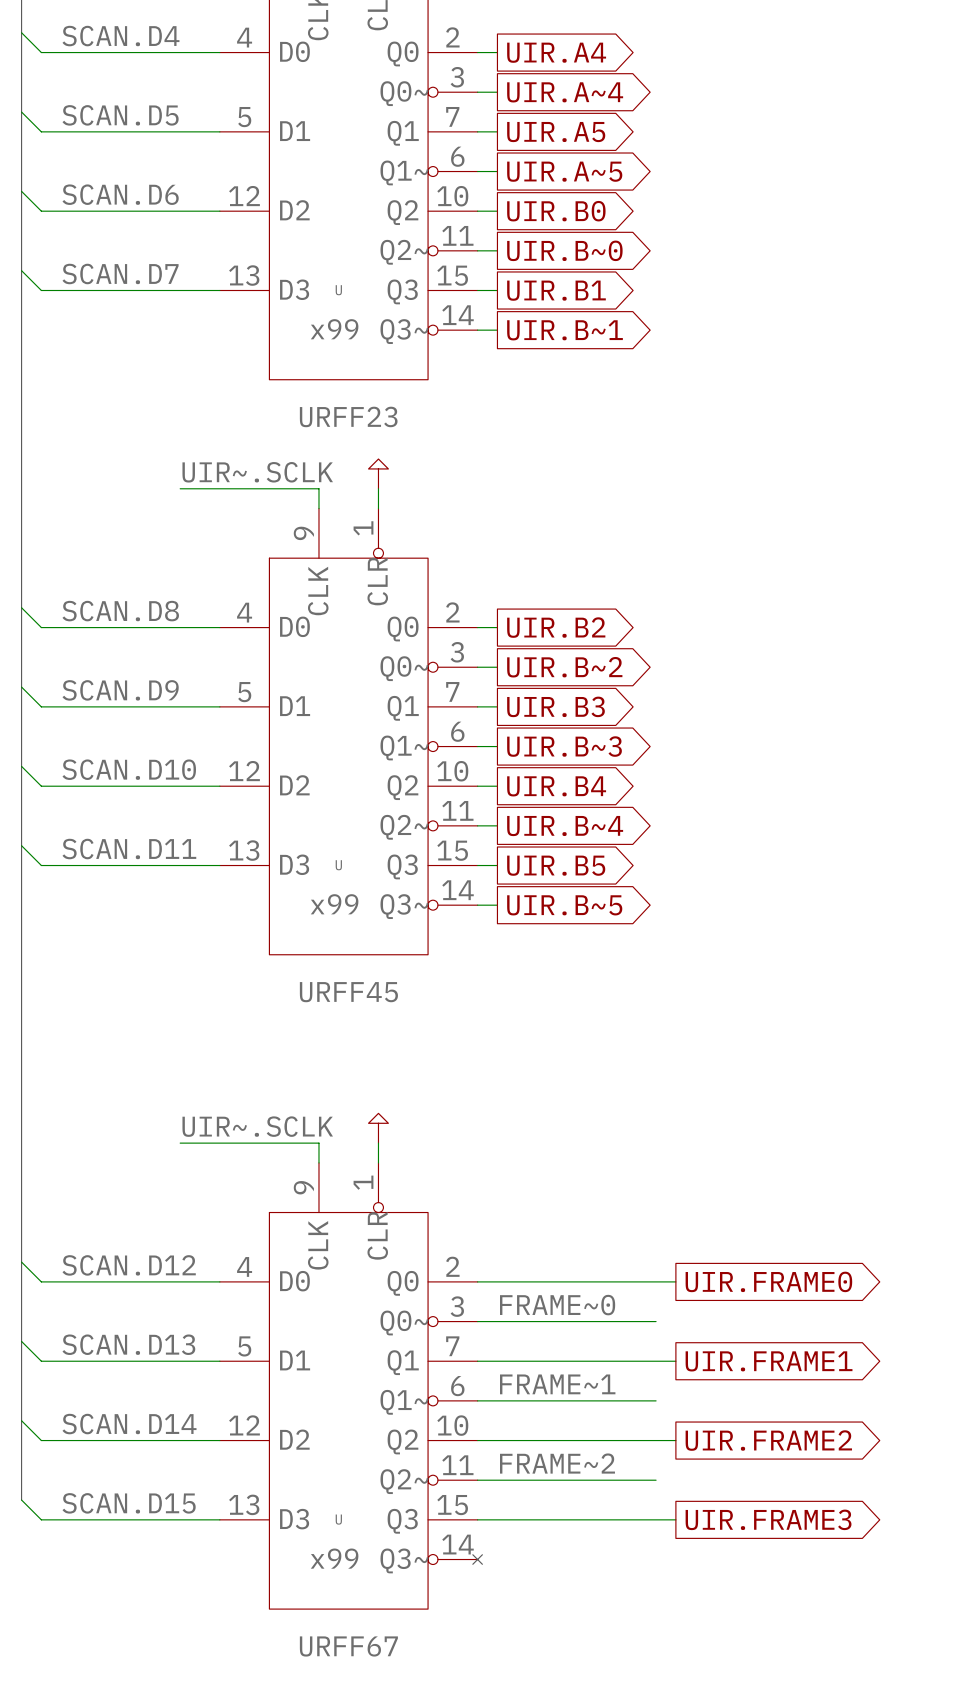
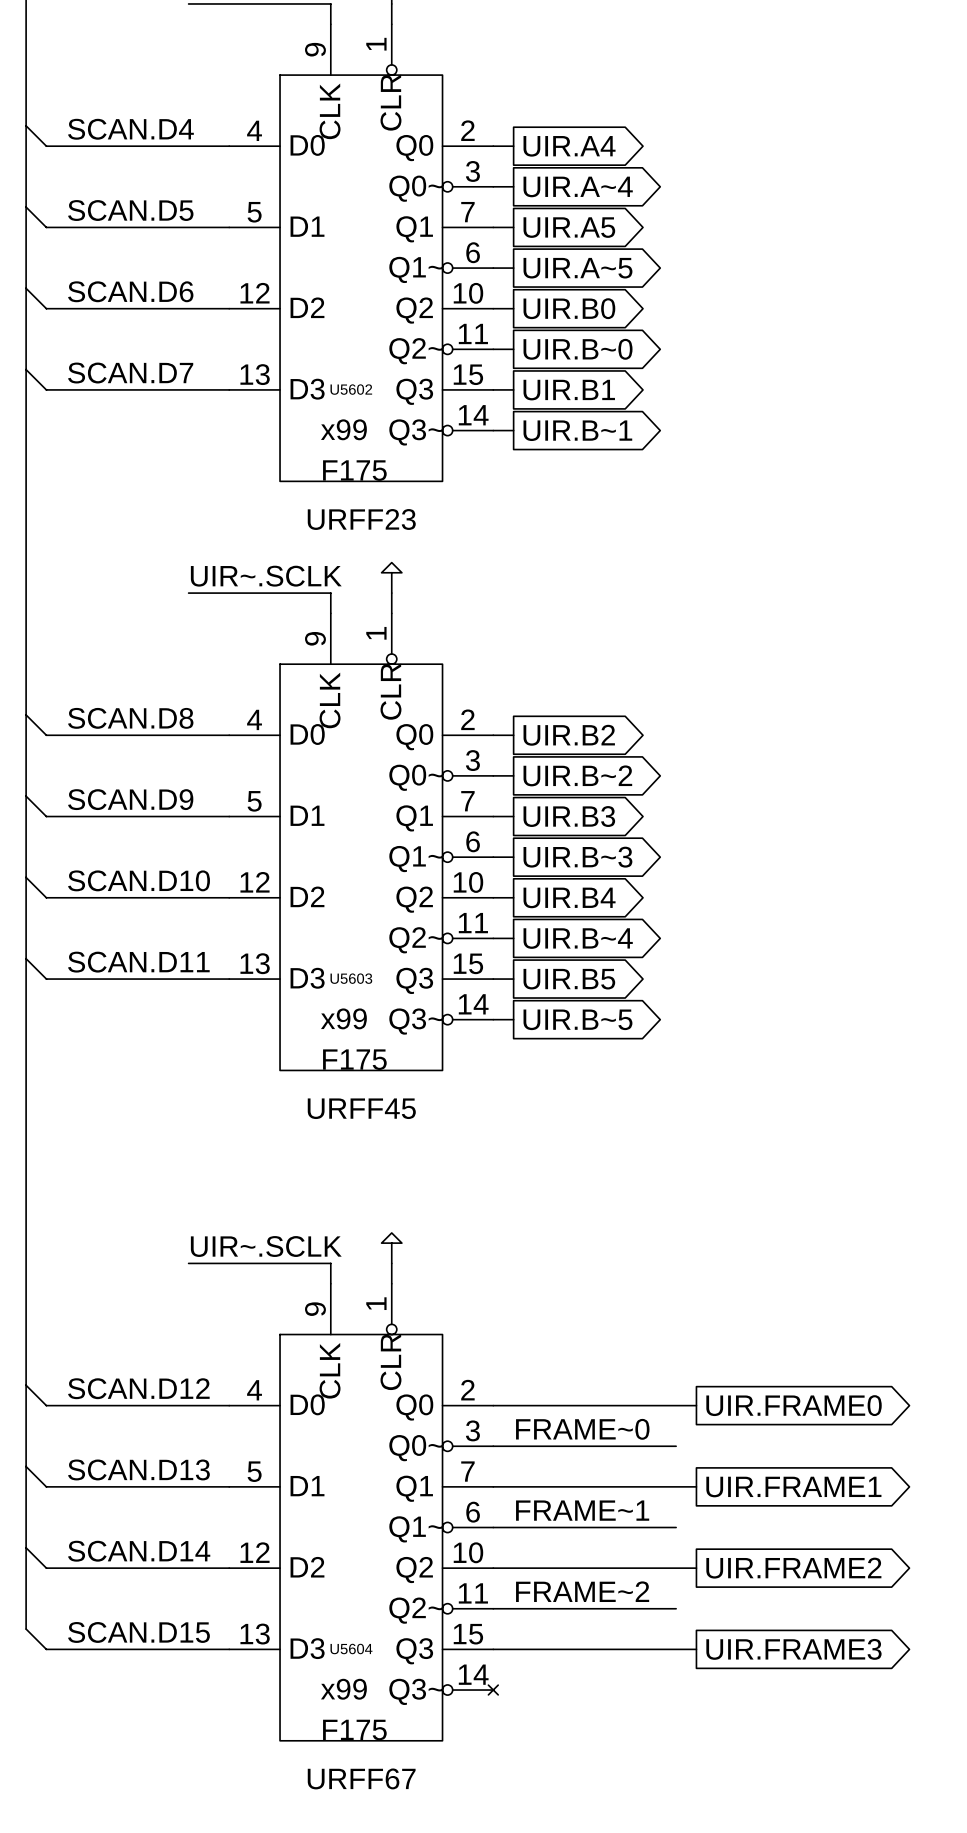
U name: U (338, 290) -> U5602 (351, 389)
U value: none -> F175 (354, 470)
U name: U (338, 865) -> U5603 (351, 978)
U value: none -> F175 (354, 1059)
U name: U (338, 1519) -> U5604 (351, 1649)
U value: none -> F175 (354, 1730)

